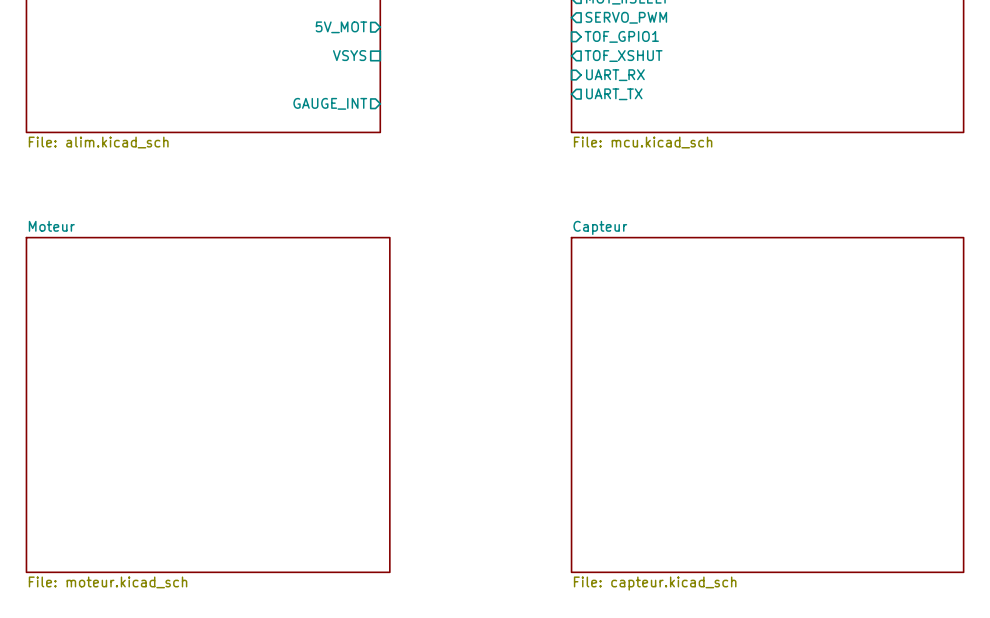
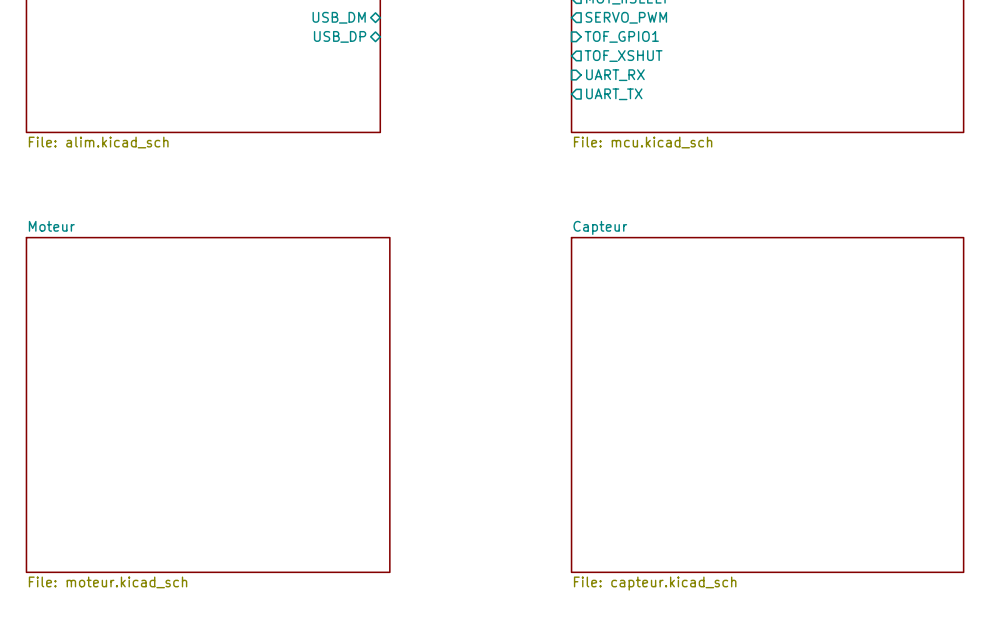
sheet pin: none -> USB_DM (339, 17)
sheet pin: 5V_MOT (341, 27) -> none
sheet pin: none -> USB_DP (340, 36)
sheet pin: VSYS (349, 55) -> none
sheet pin: GAUGE_INT (330, 103) -> none

